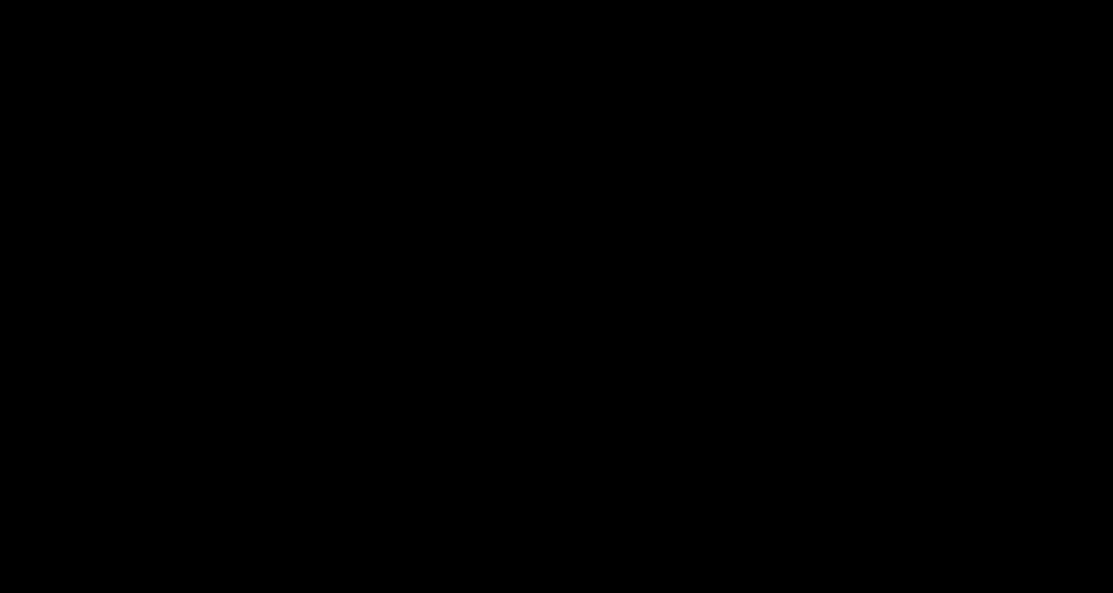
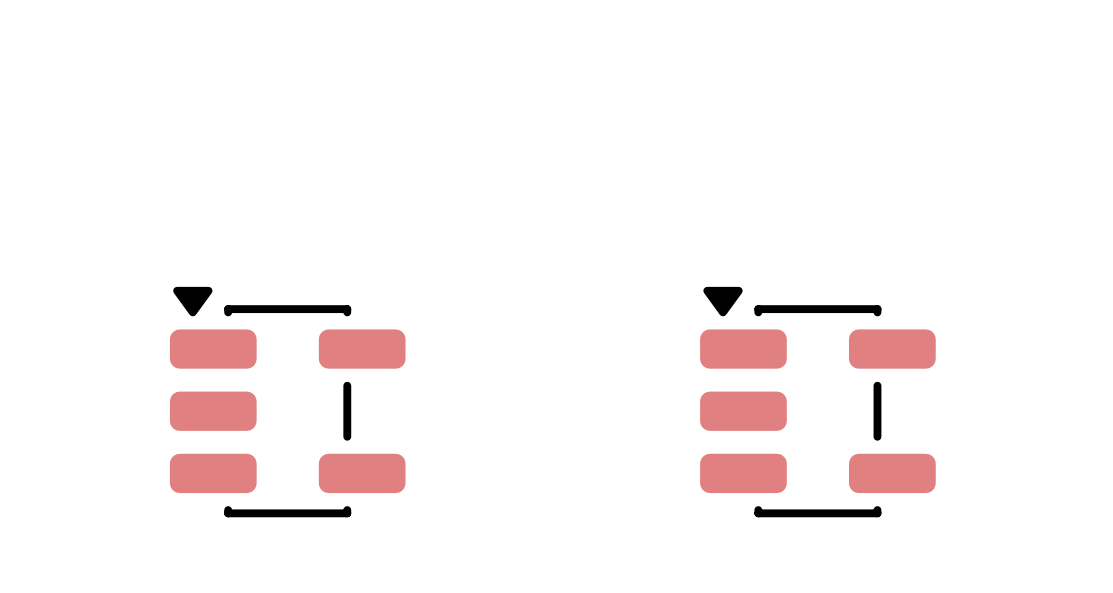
part: none -> (287, 402)
part: none -> (817, 402)

